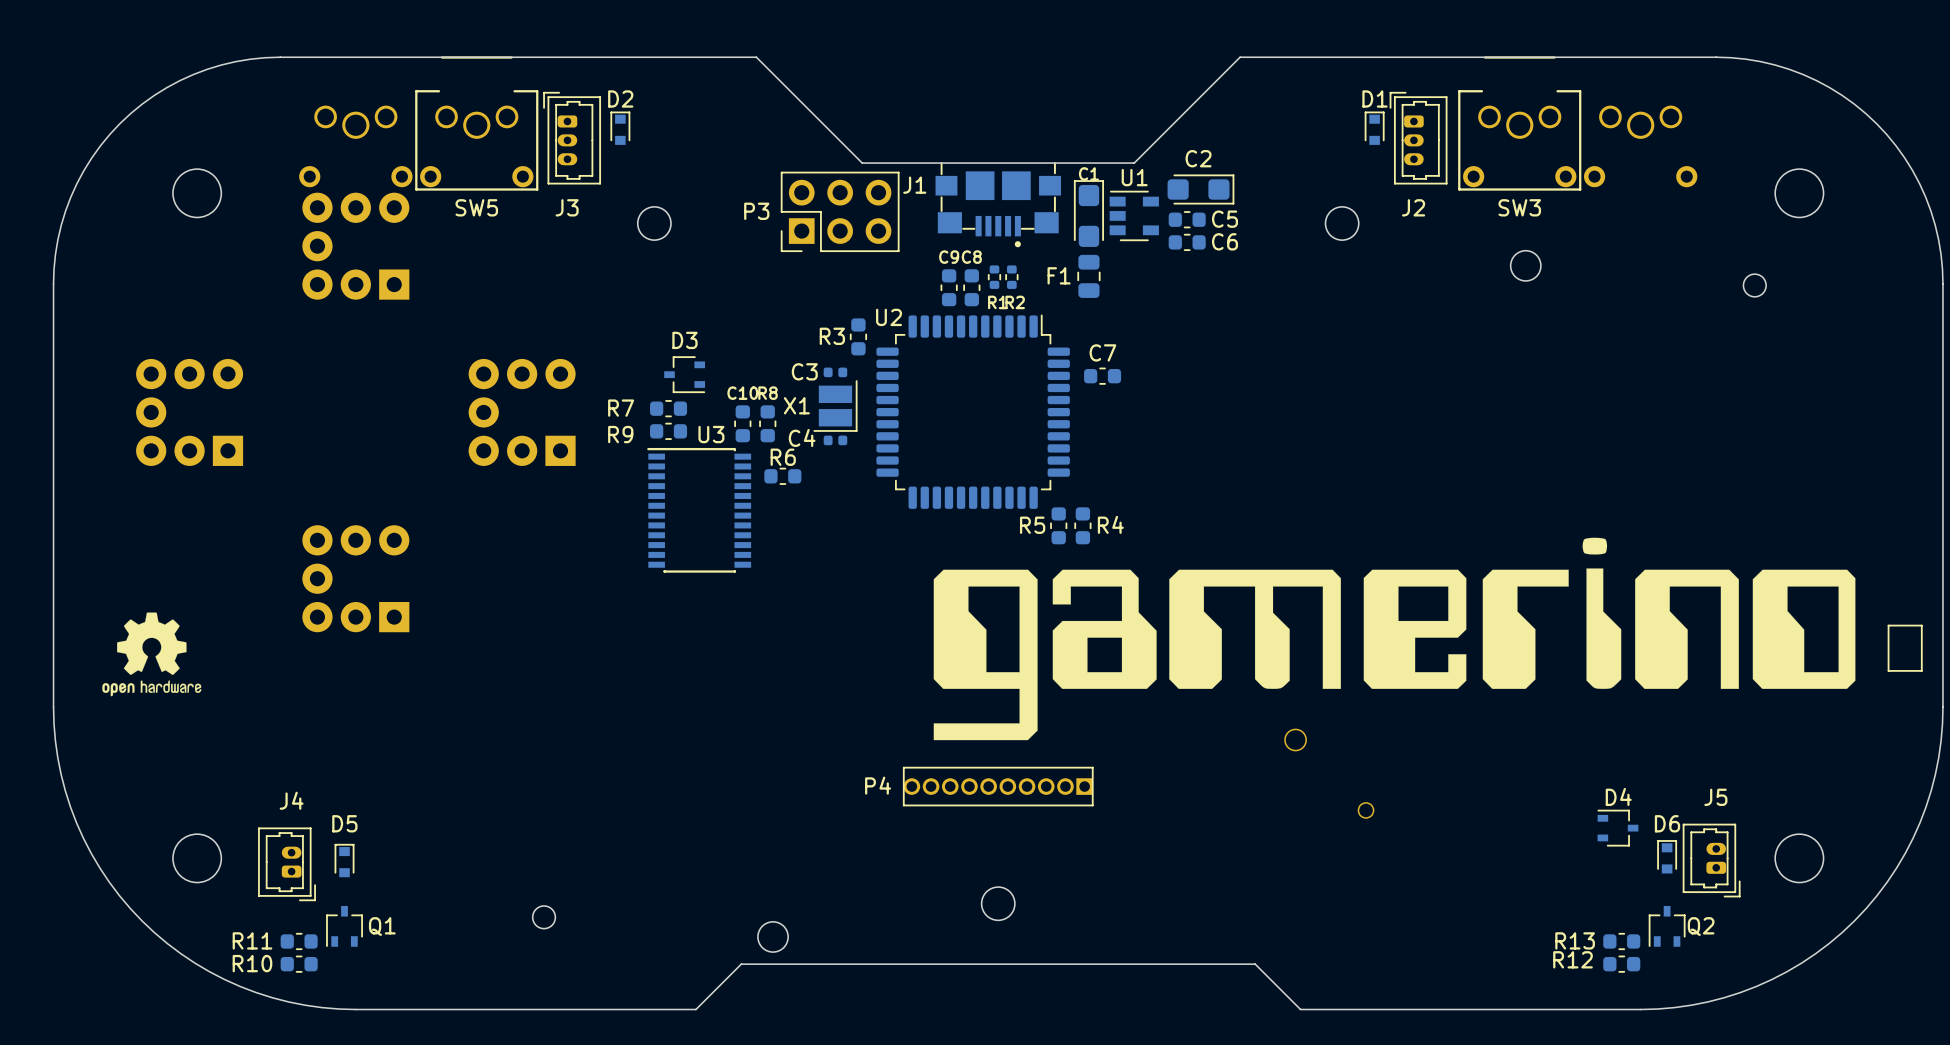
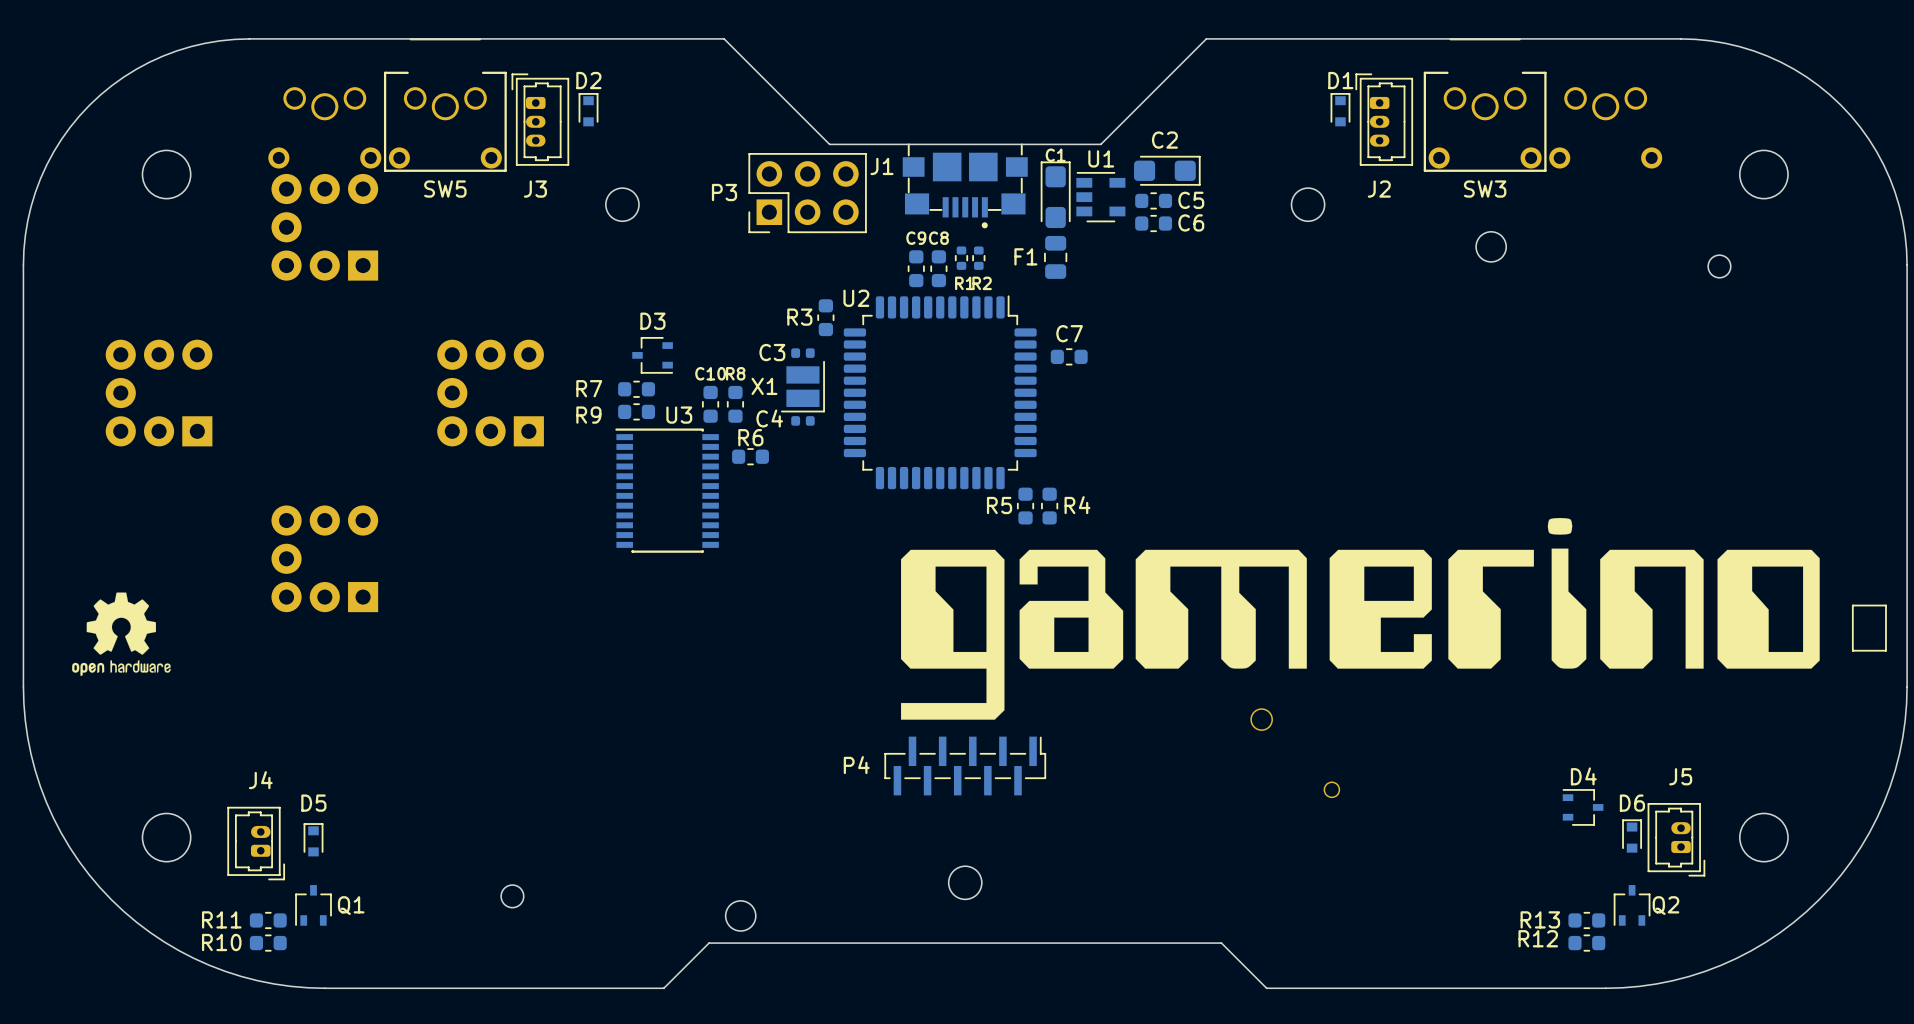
P4 footprint: [902, 766, 1094, 807] -> [884, 736, 1047, 796]

